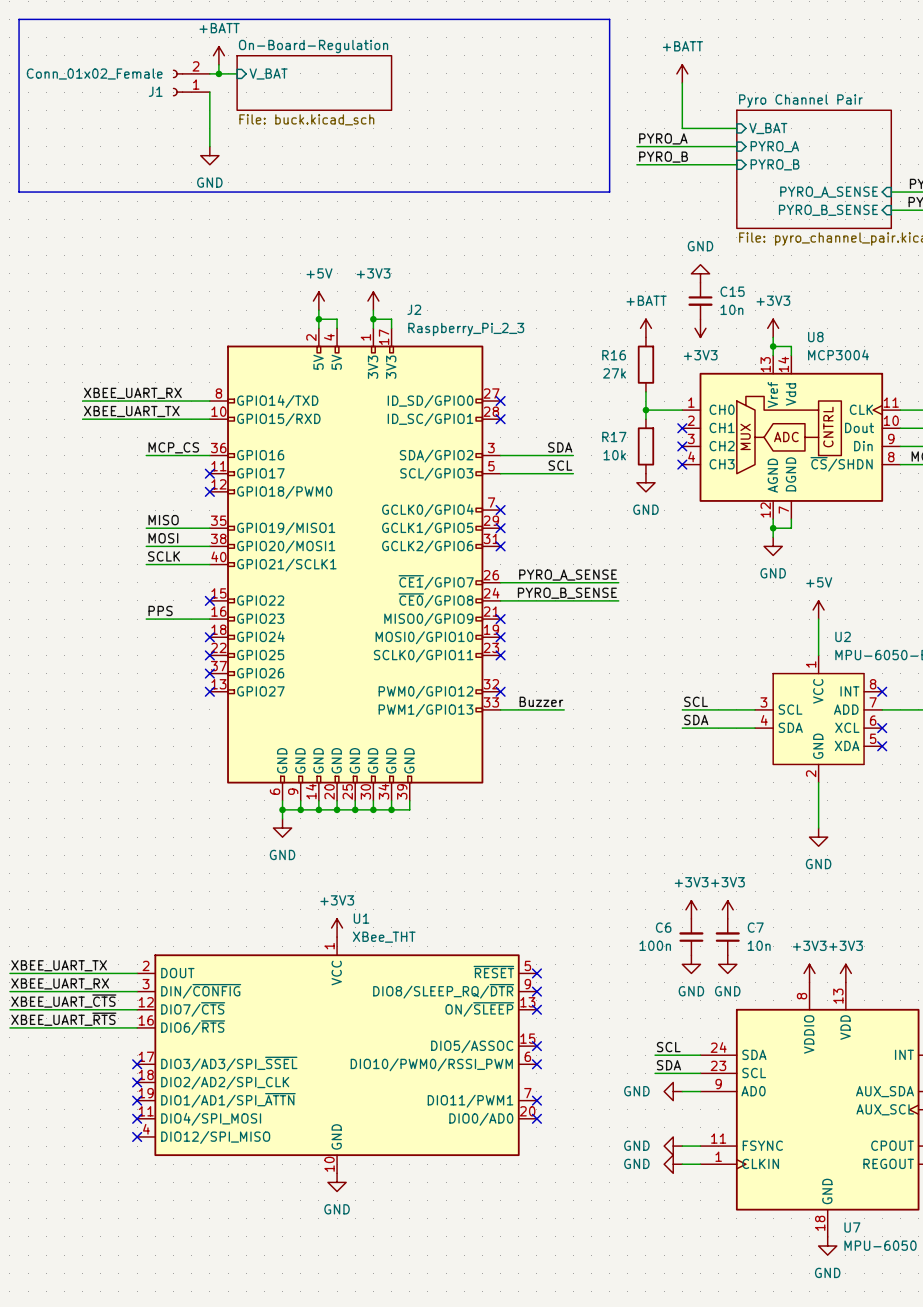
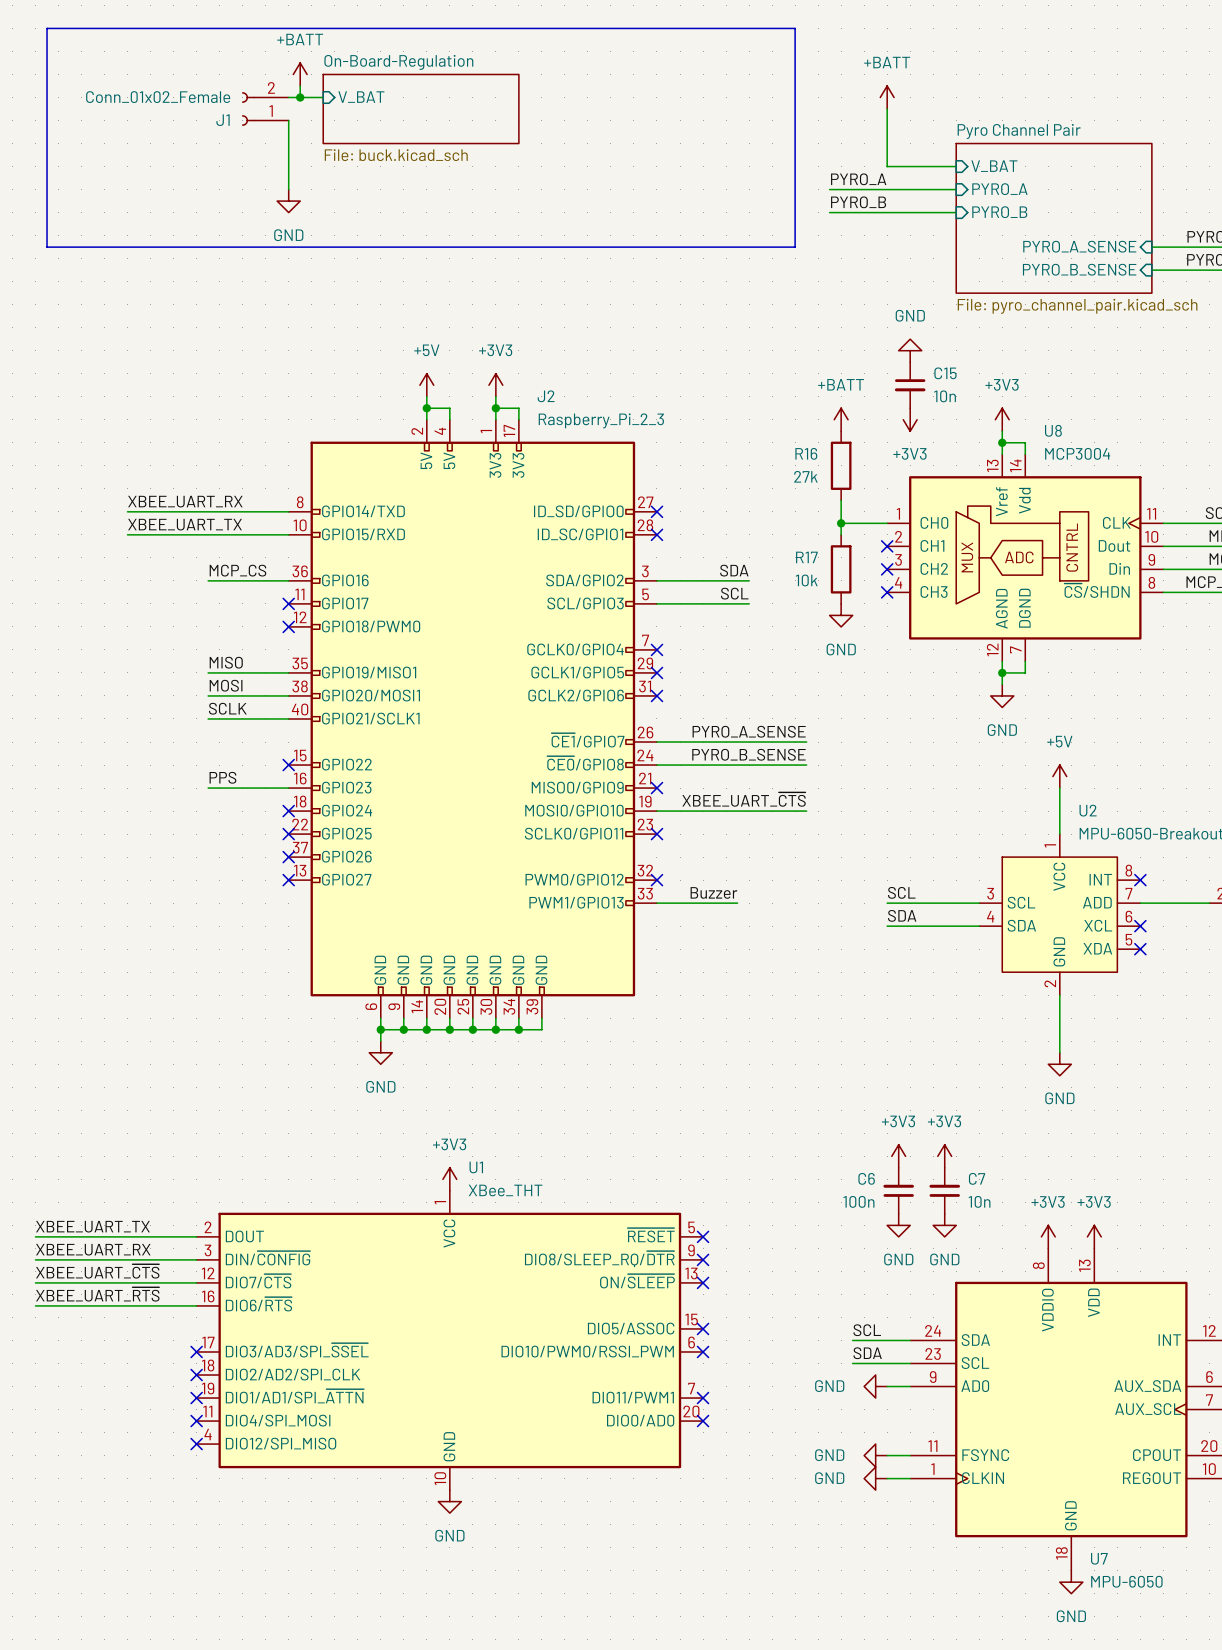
label: none -> XBEE_UART_~{CTS} (744, 799)
wire: none -> (656, 811) (806, 811)
no-connect mark: (500, 637) -> none

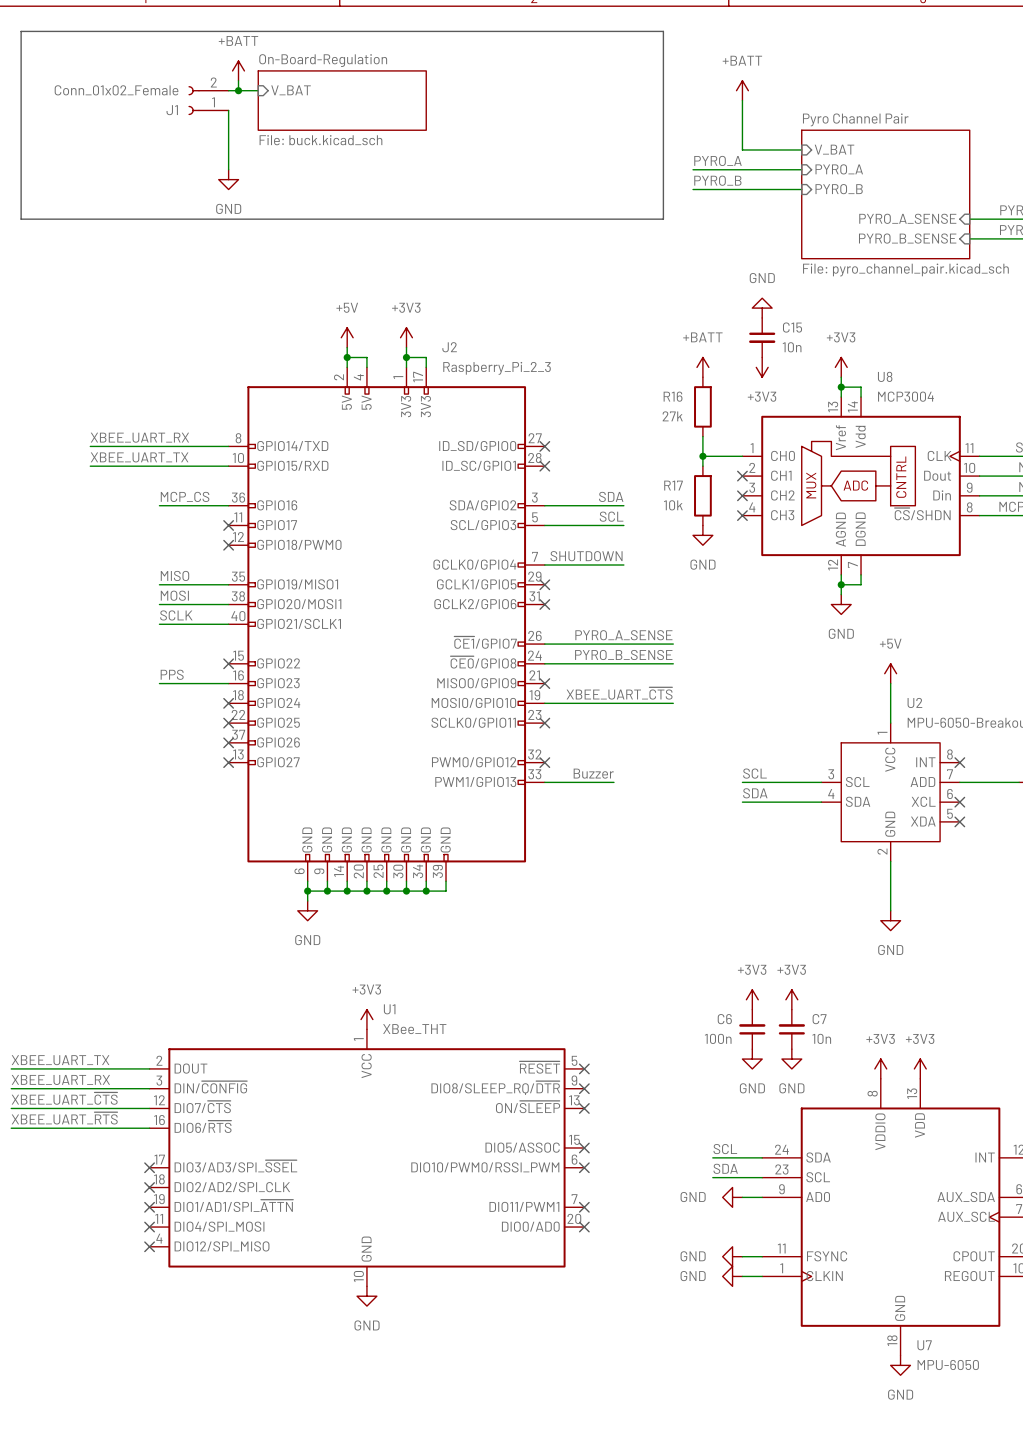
label: none -> SHUTDOWN (586, 556)
wire: none -> (544, 565) (623, 565)
no-connect mark: (656, 649) -> none

